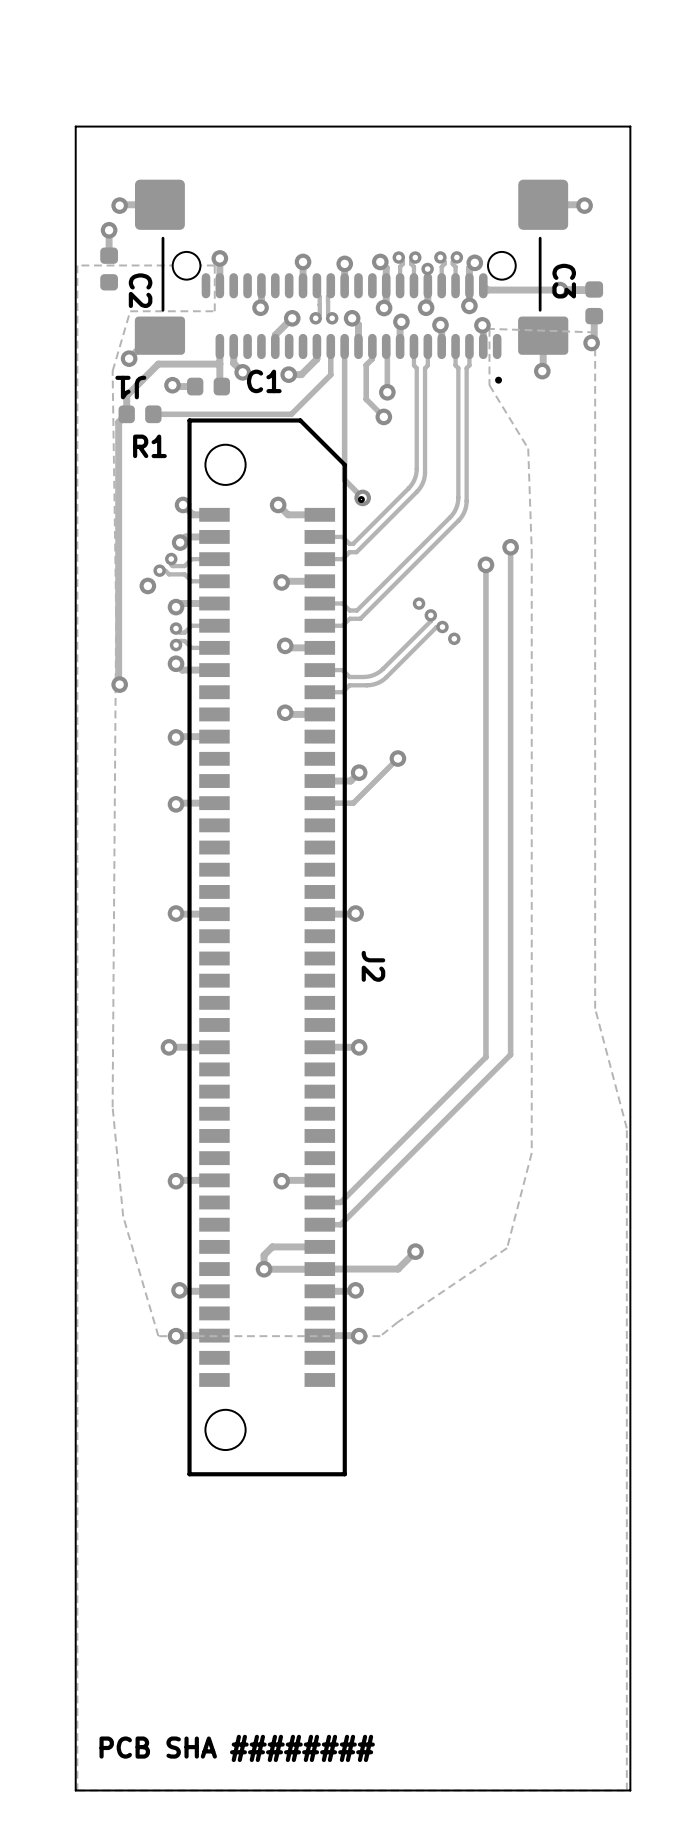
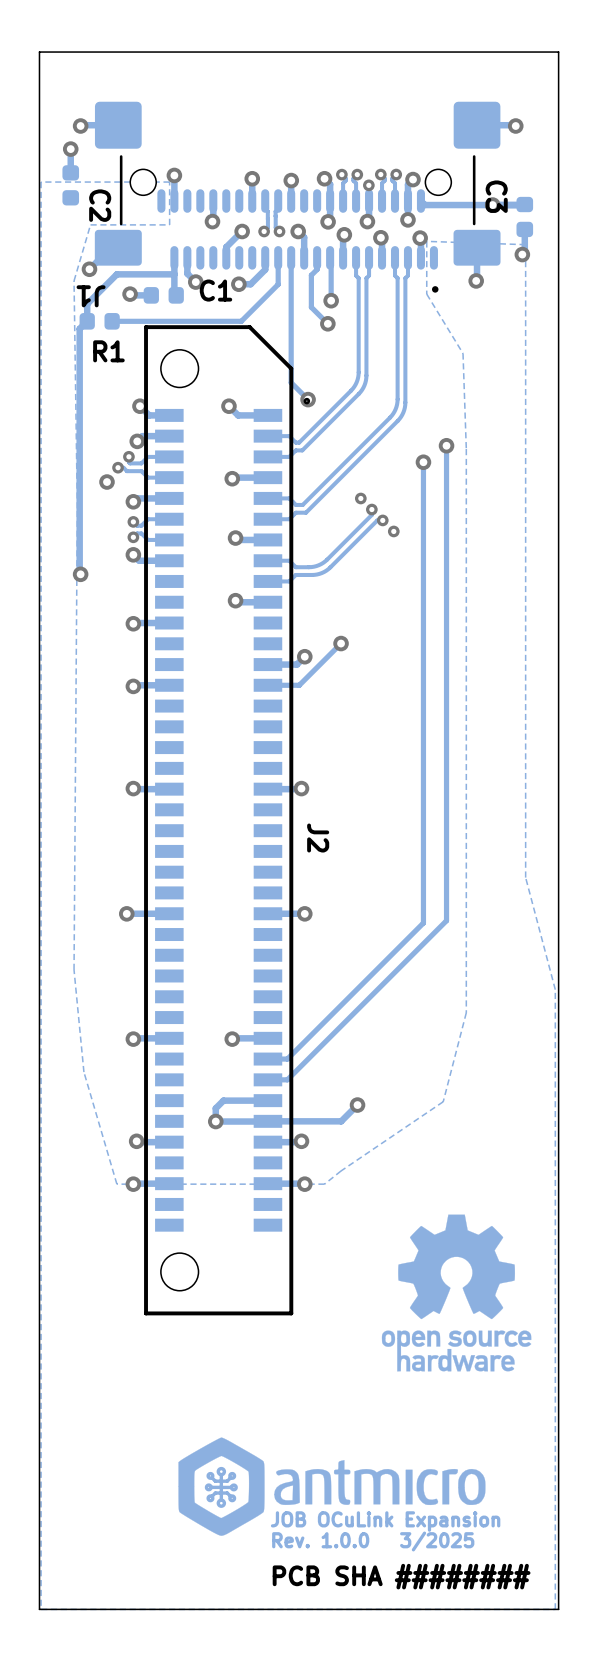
drawing: none -> [381, 1214, 532, 1372]
drawing: none -> [178, 1437, 486, 1536]
text: none -> JOB OCuLink Expansion (385, 1521)
text: none -> Rev. 1.0.0 3/2025 (373, 1541)
text position: PCB SHA ######## (237, 1748) -> PCB SHA ######## (401, 1576)

